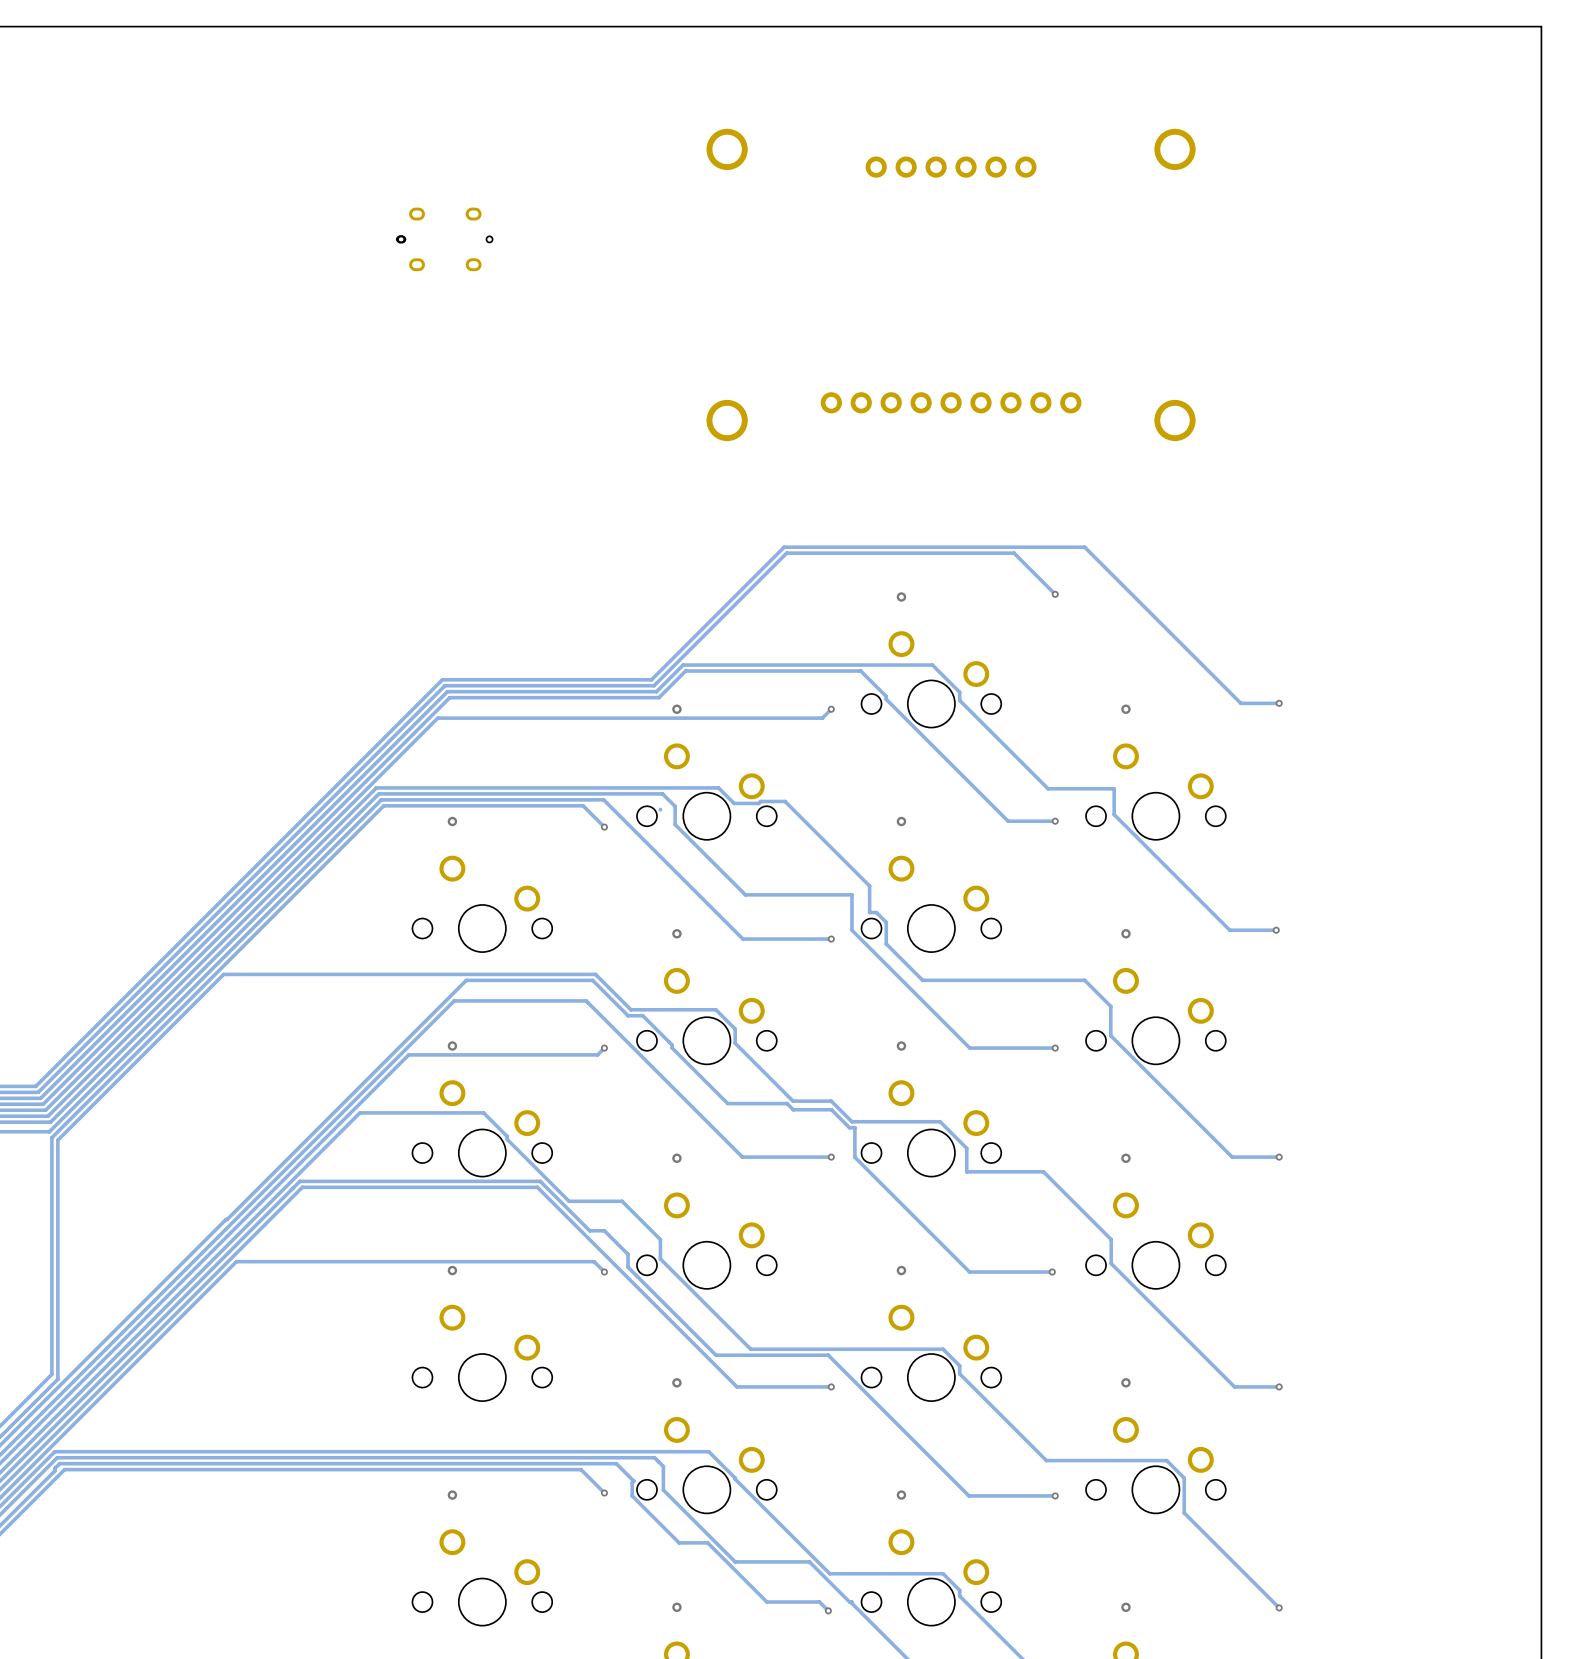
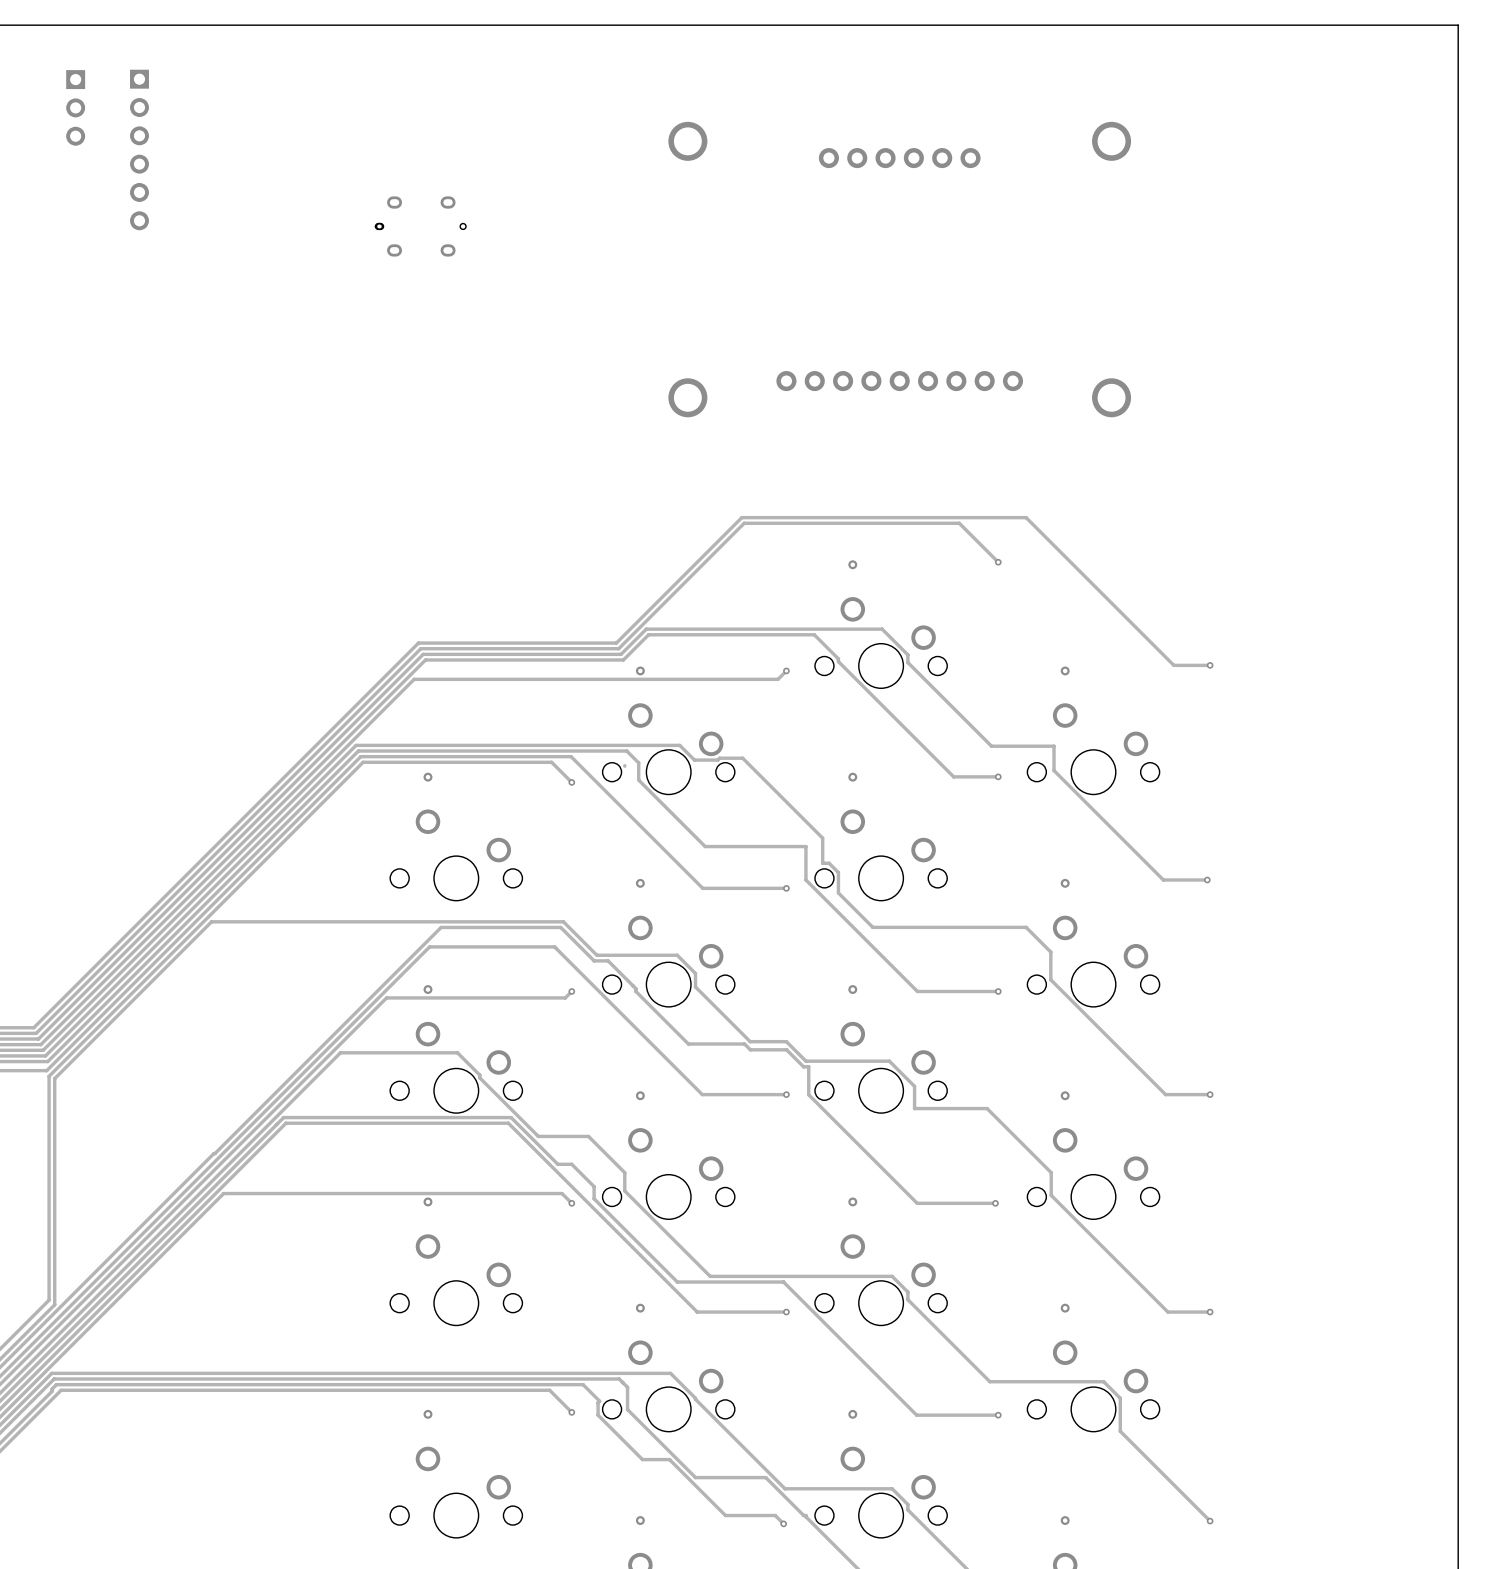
part: none -> (75, 107)
part: none -> (139, 149)

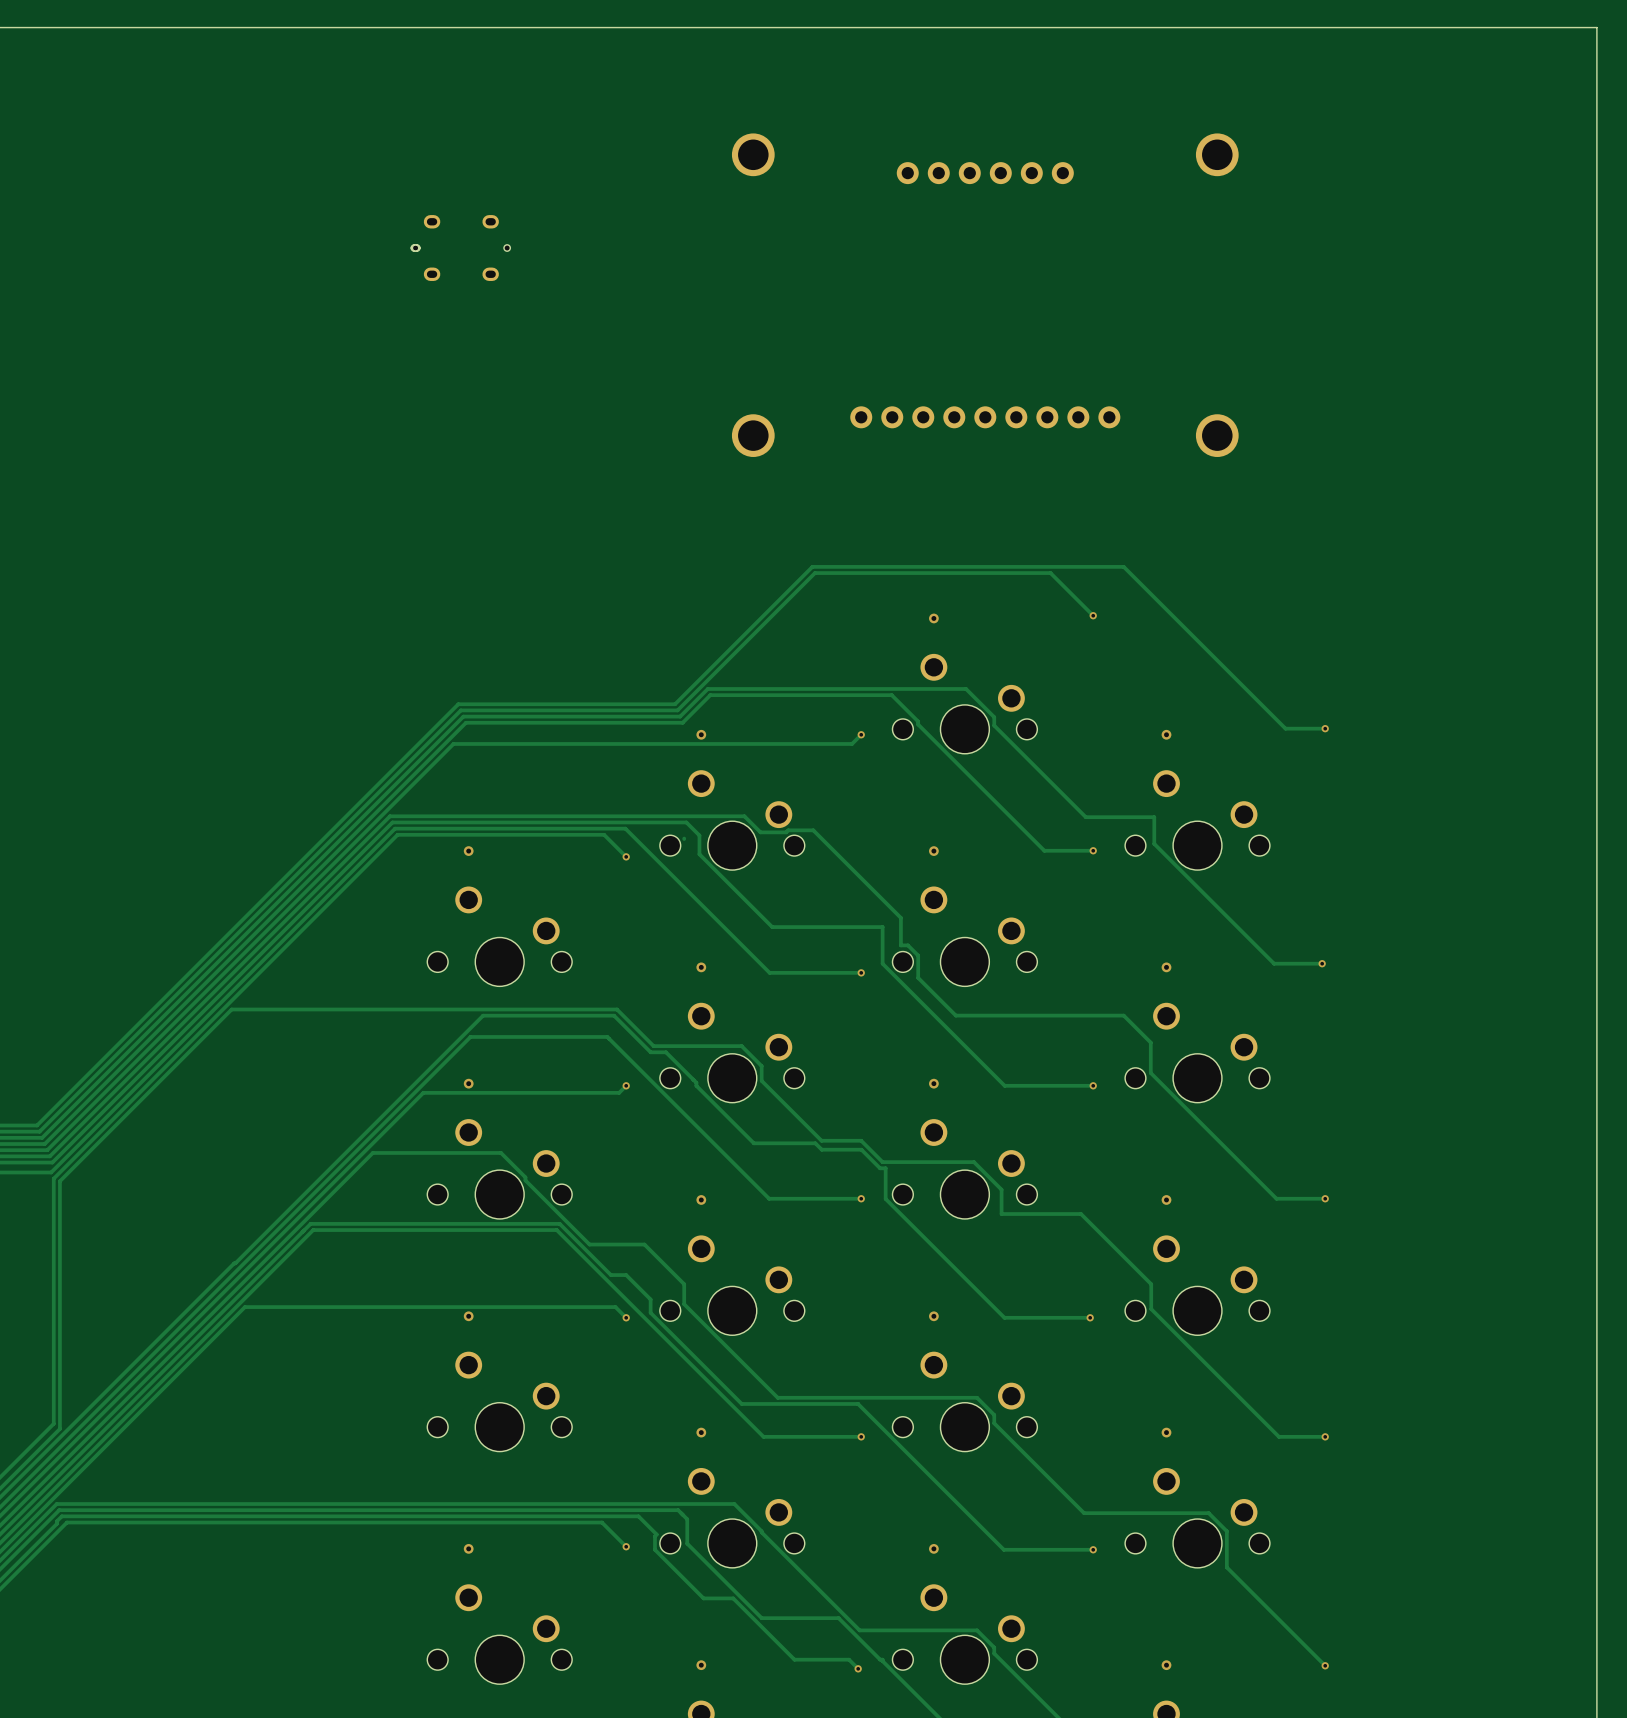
part: (75, 107) -> none
part: (139, 149) -> none

